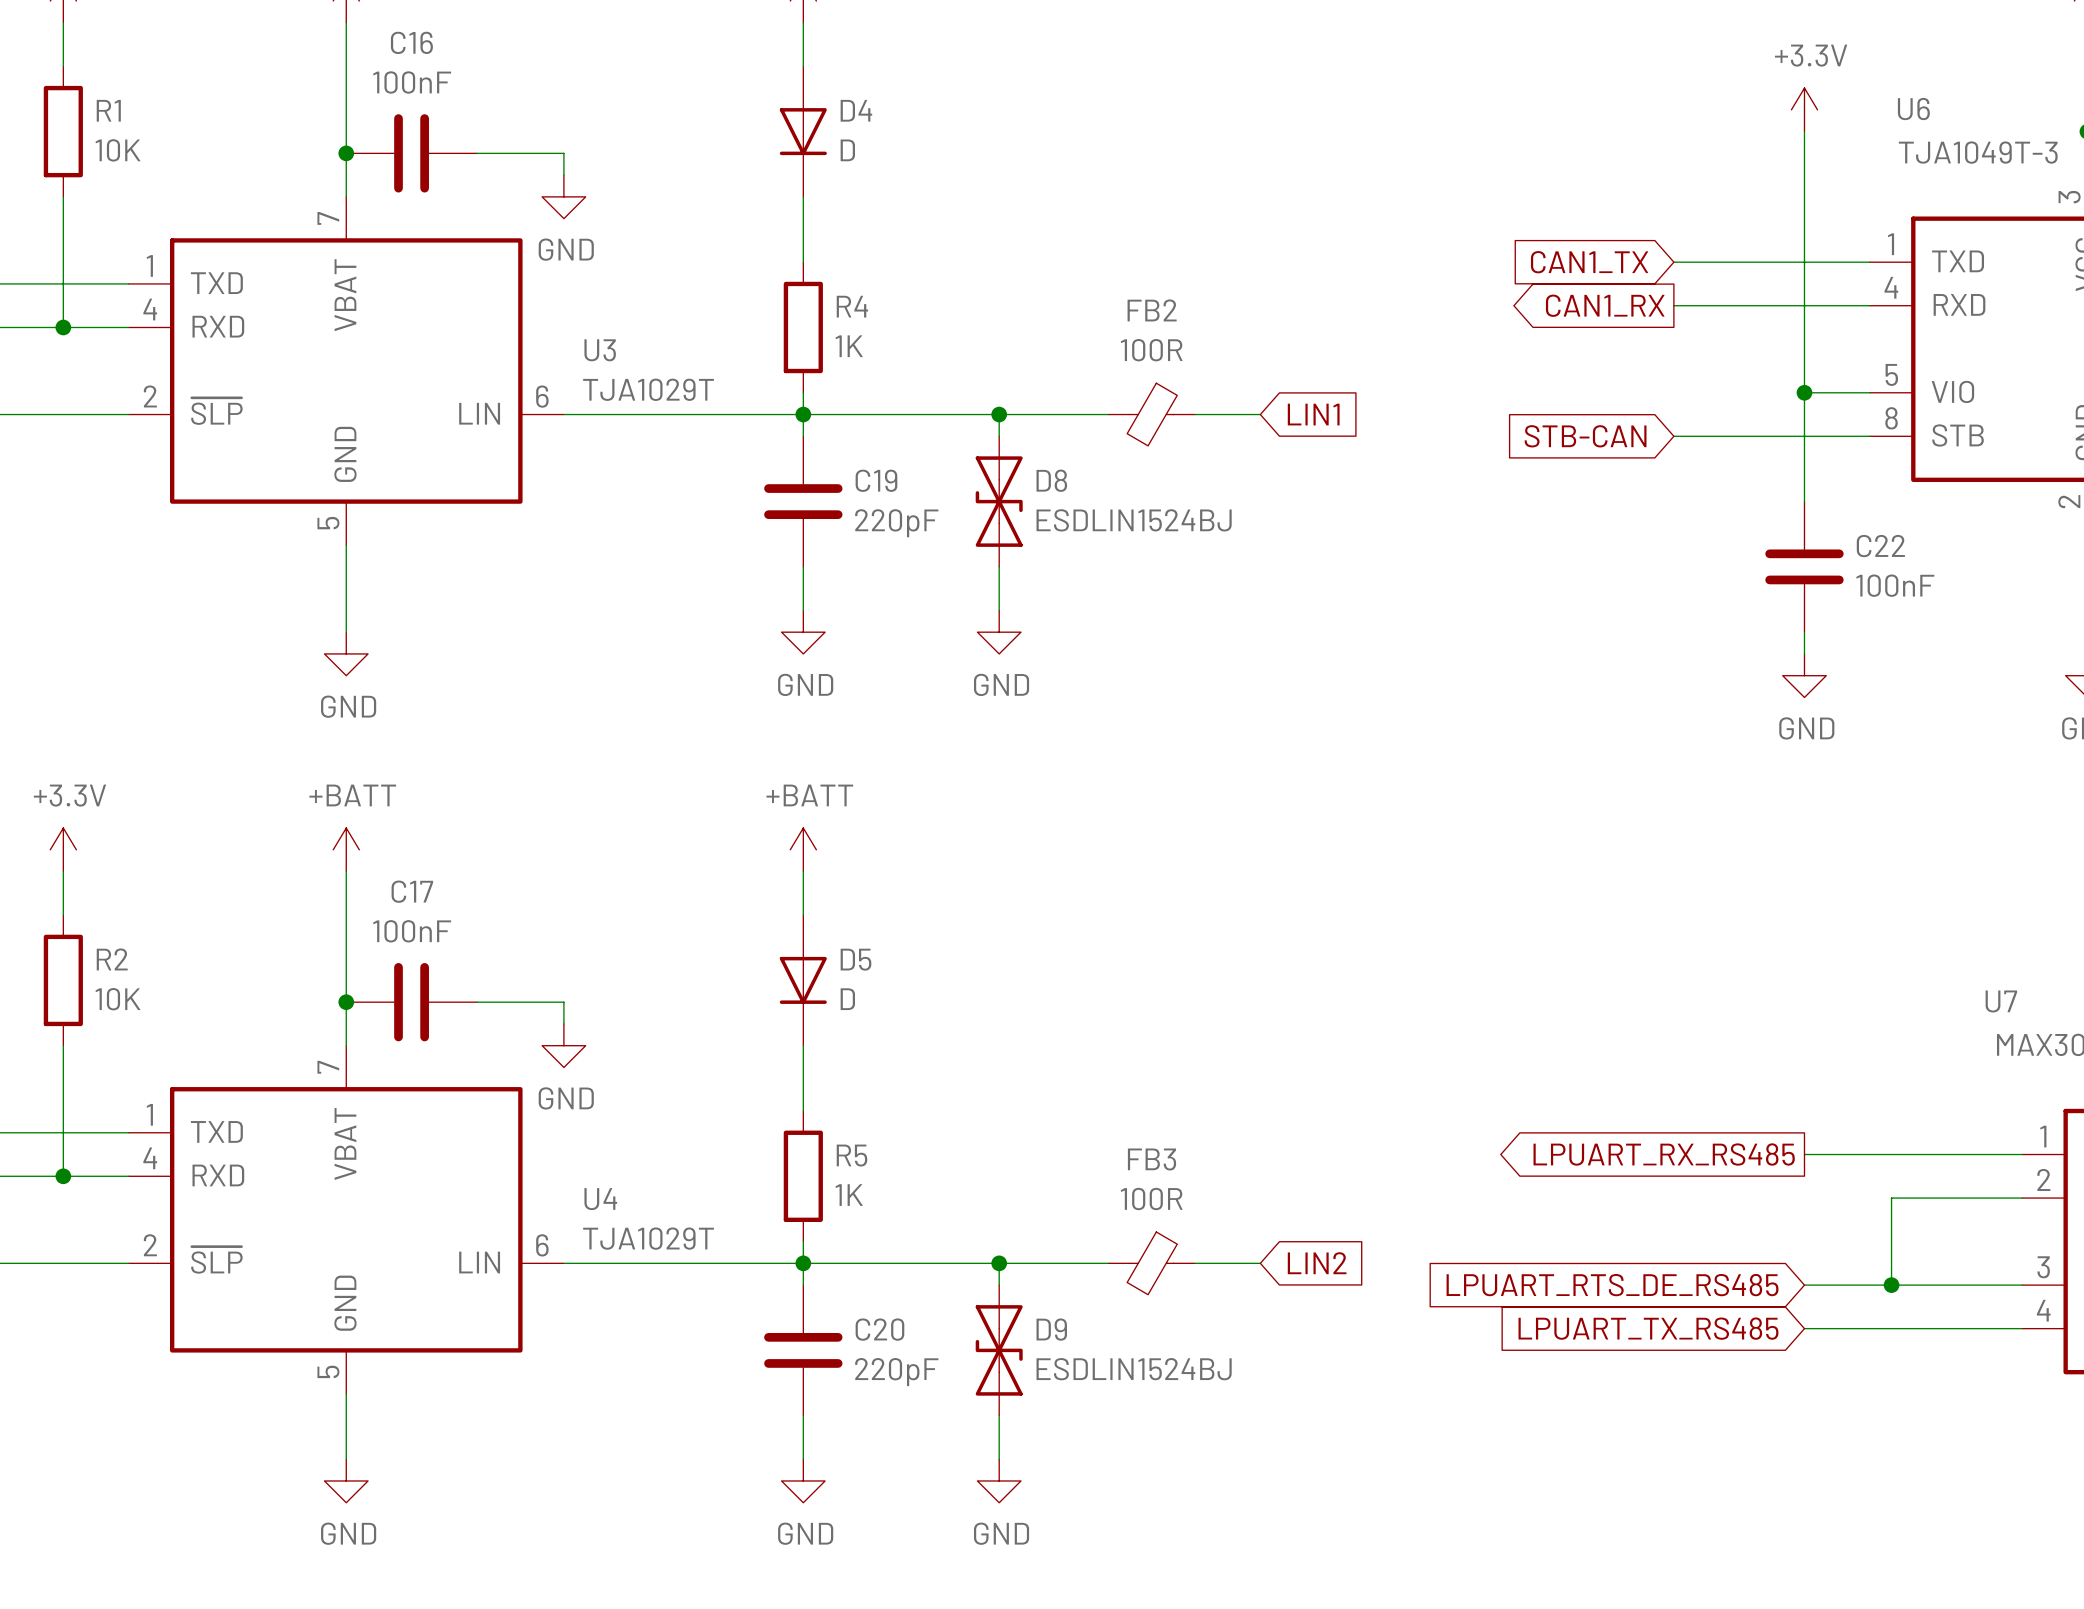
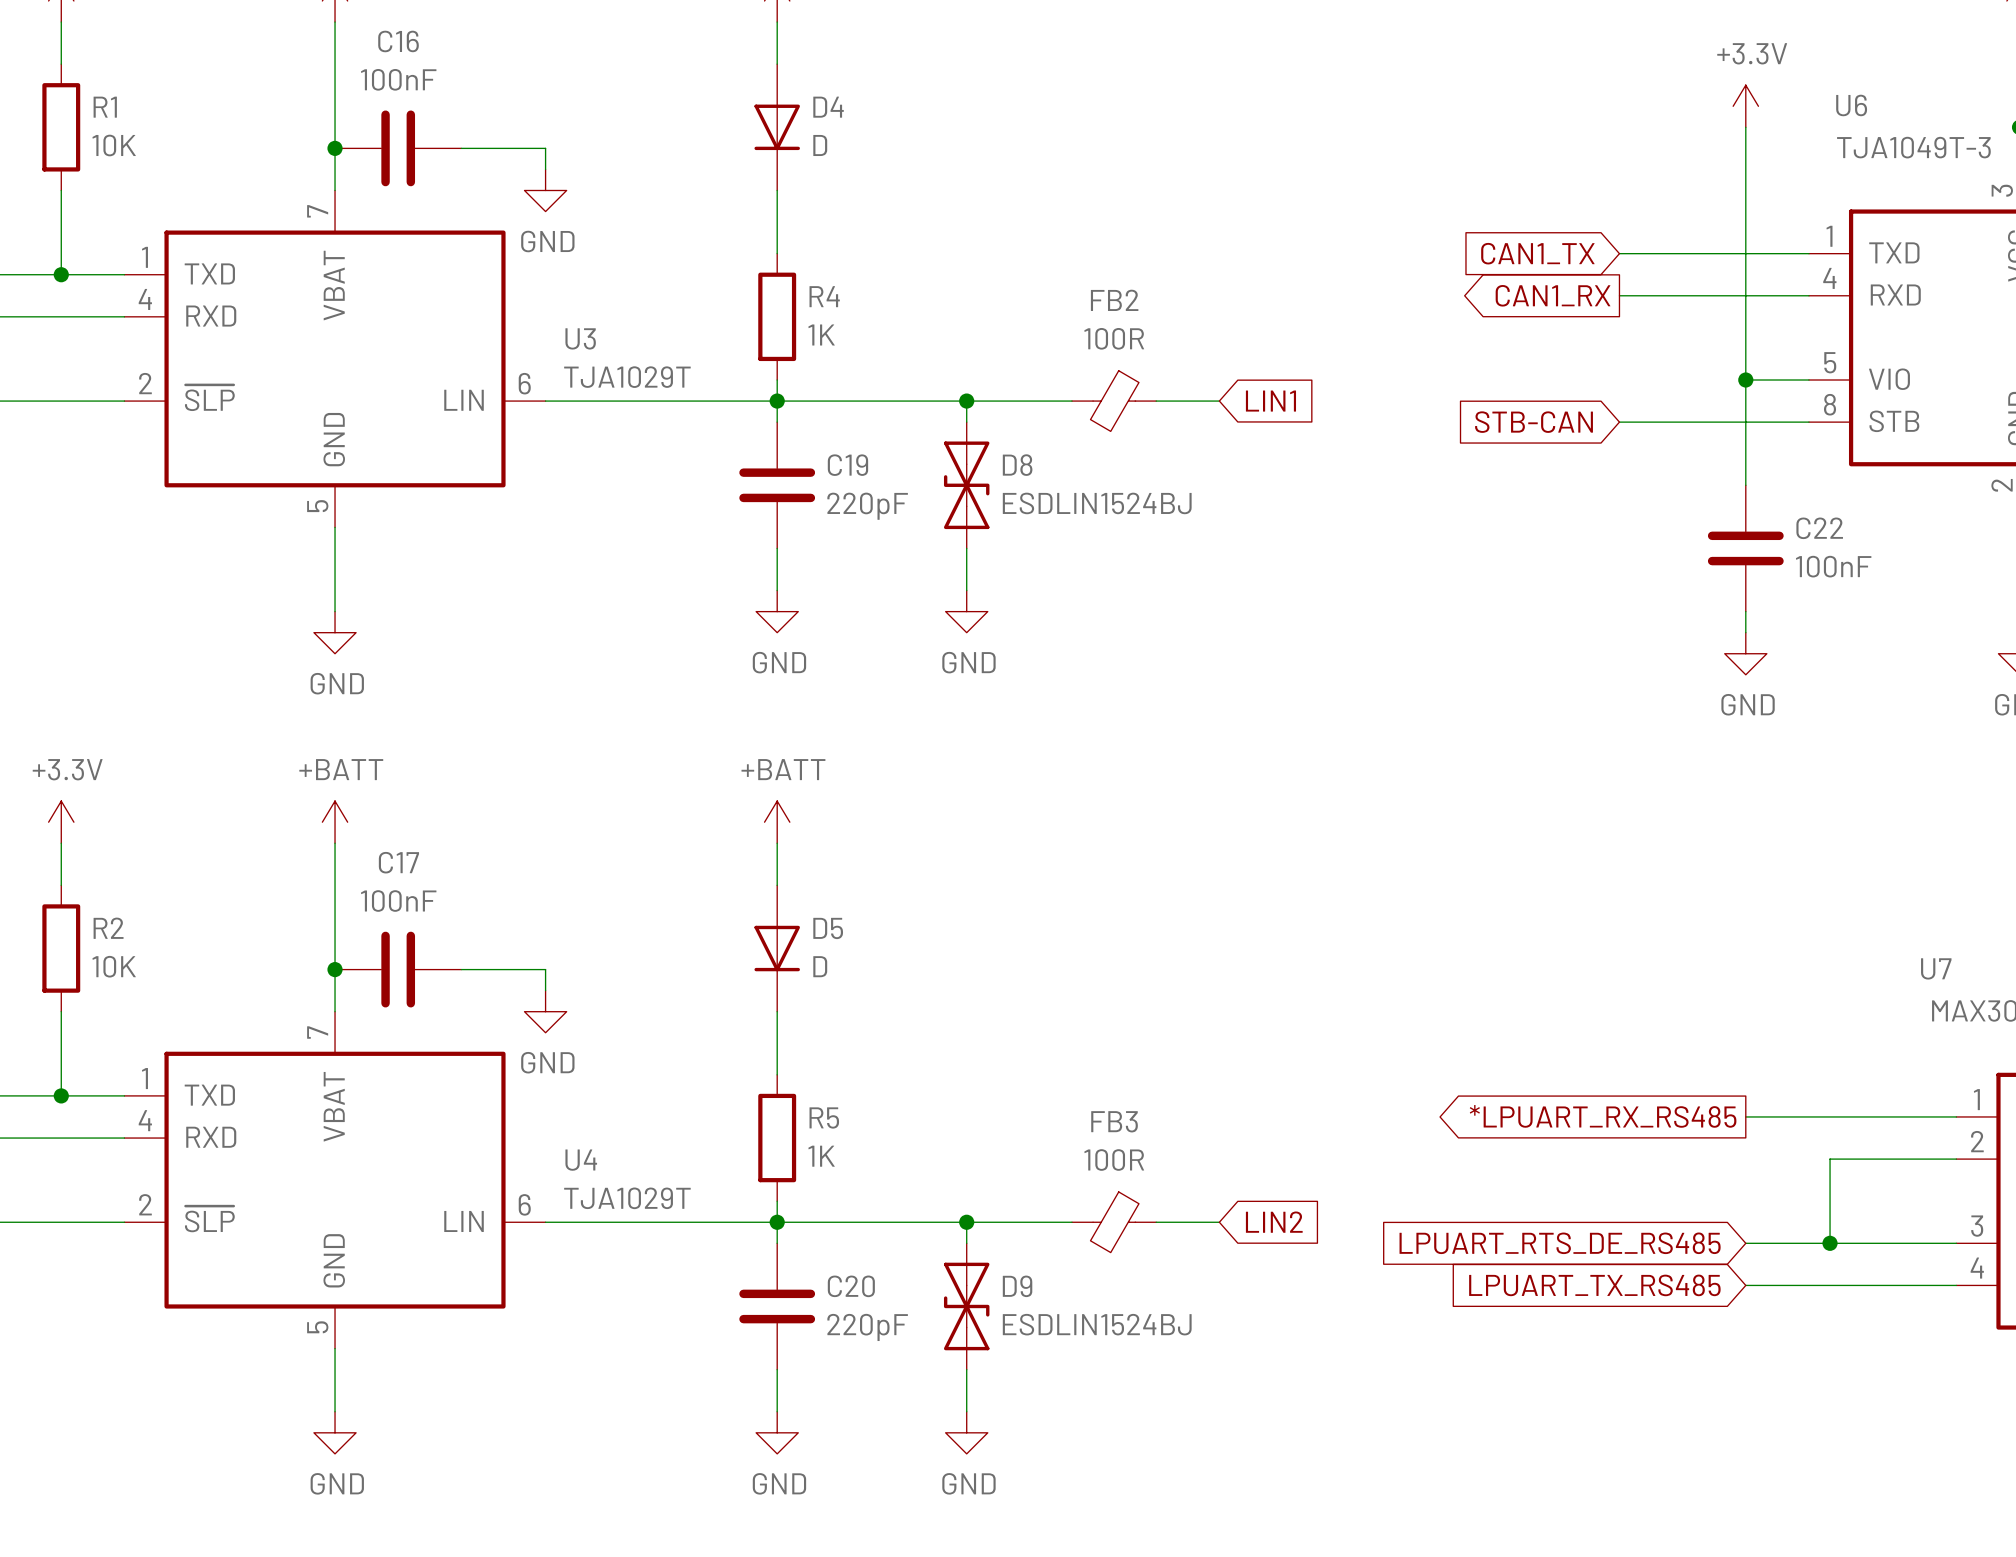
wire: (63, 283) (63, 327) -> none
junction position: (63, 327) -> (61, 274)
wire: (63, 1132) (63, 1176) -> none
global label: LPUART_RX_RS485 (1664, 1154) -> *LPUART_RX_RS485 (1603, 1116)
junction position: (63, 1176) -> (61, 1095)

